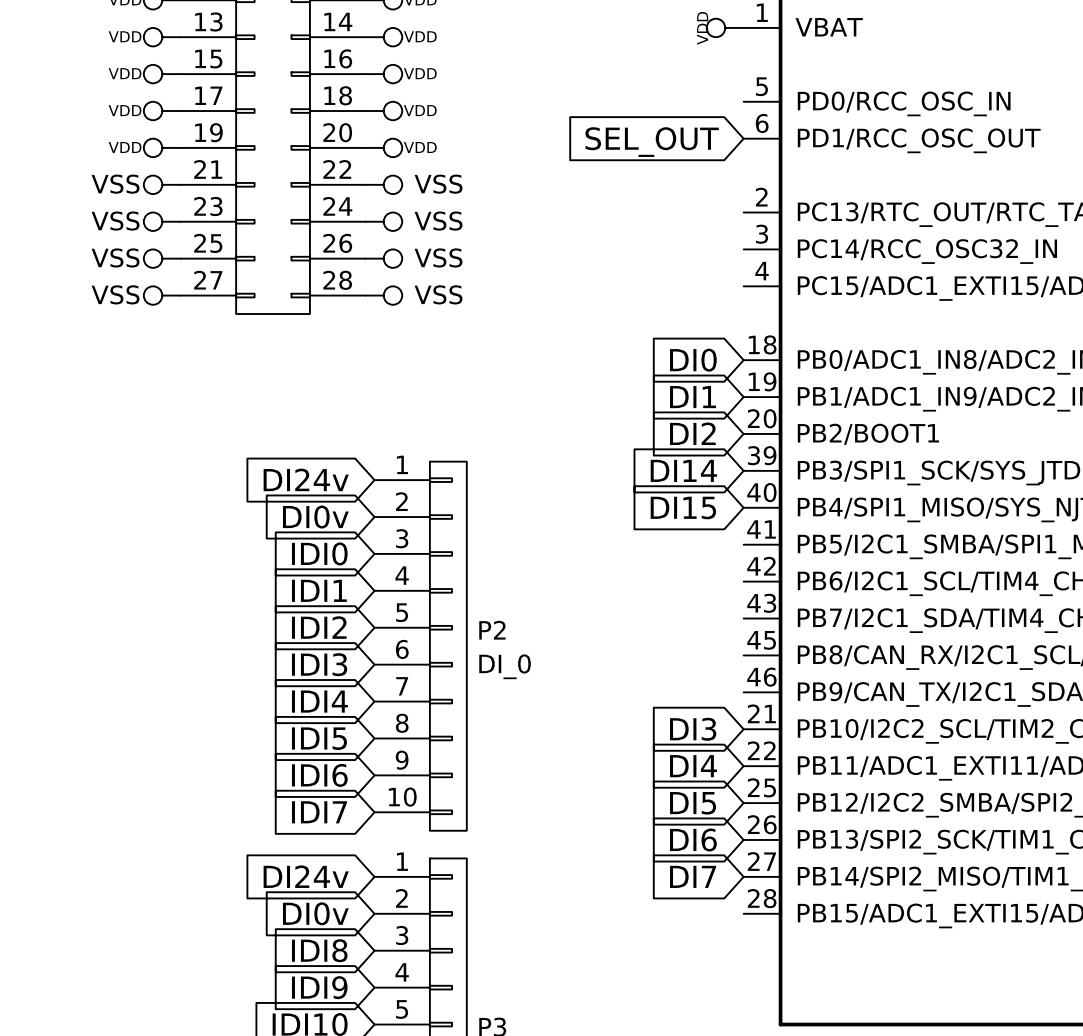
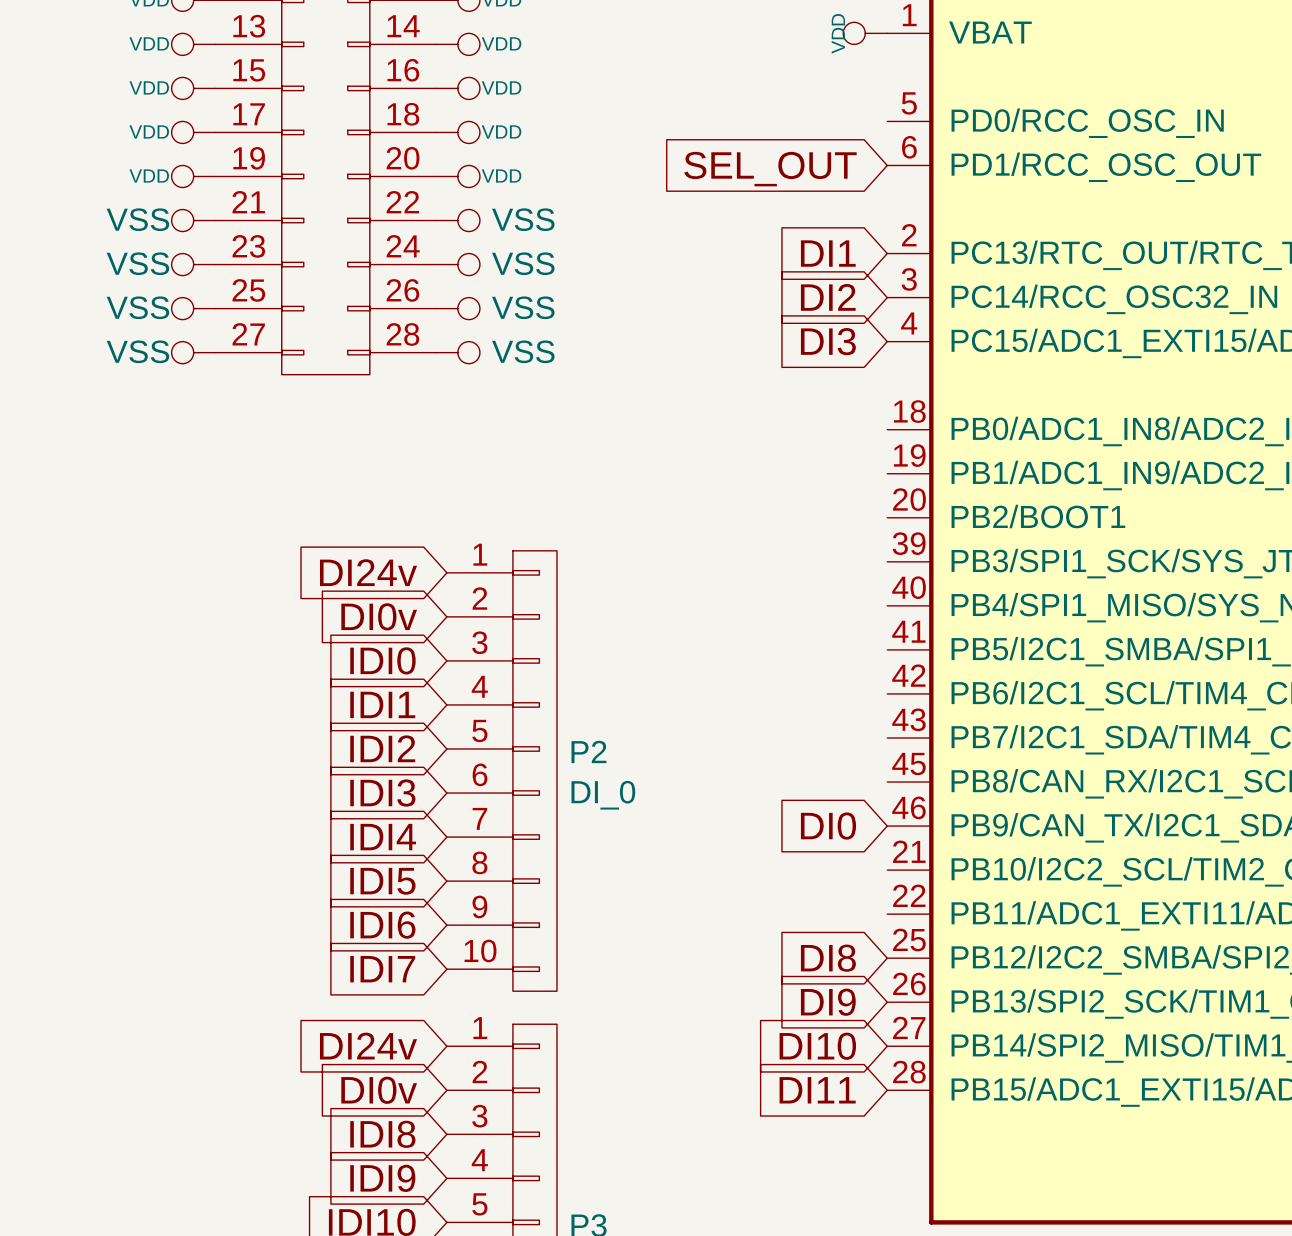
global label: none -> DI3 (828, 341)
global label position: DI0 (693, 360) -> DI0 (828, 826)
global label position: DI1 (692, 397) -> DI1 (828, 253)
global label position: DI2 (692, 433) -> DI2 (828, 297)
global label: DI14 (683, 470) -> none
global label: DI15 (683, 508) -> none
global label: DI3 (693, 729) -> none
global label: DI4 (693, 766) -> none
global label: DI5 (693, 803) -> DI8 (828, 958)
global label: DI6 (693, 840) -> DI9 (828, 1002)
global label: DI7 (693, 876) -> DI10 (817, 1046)
global label: none -> DI11 (817, 1090)

